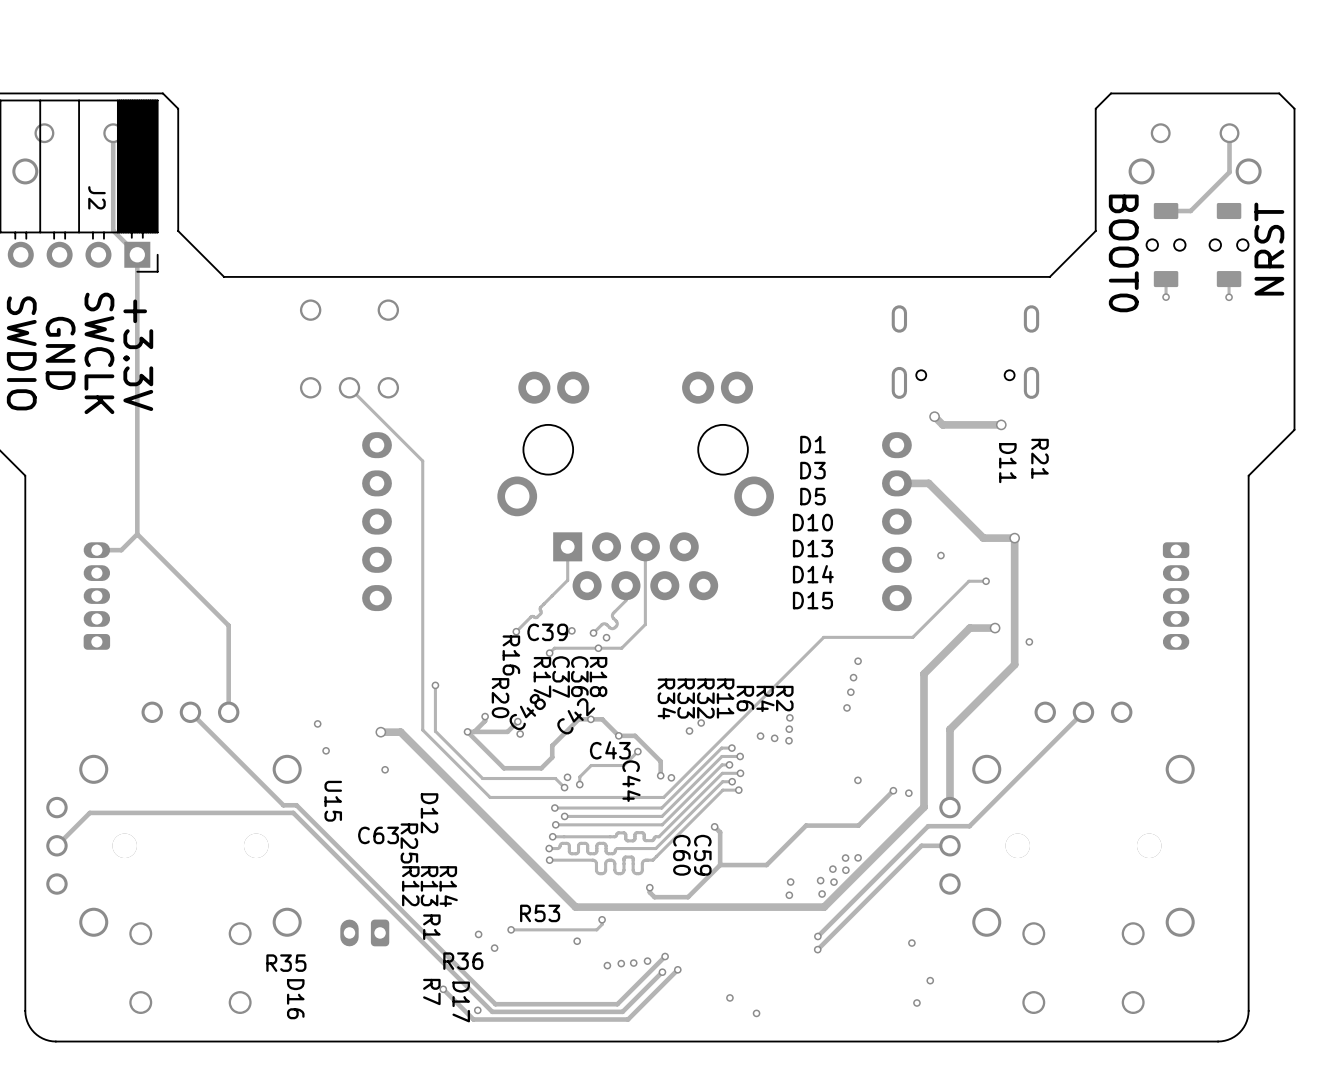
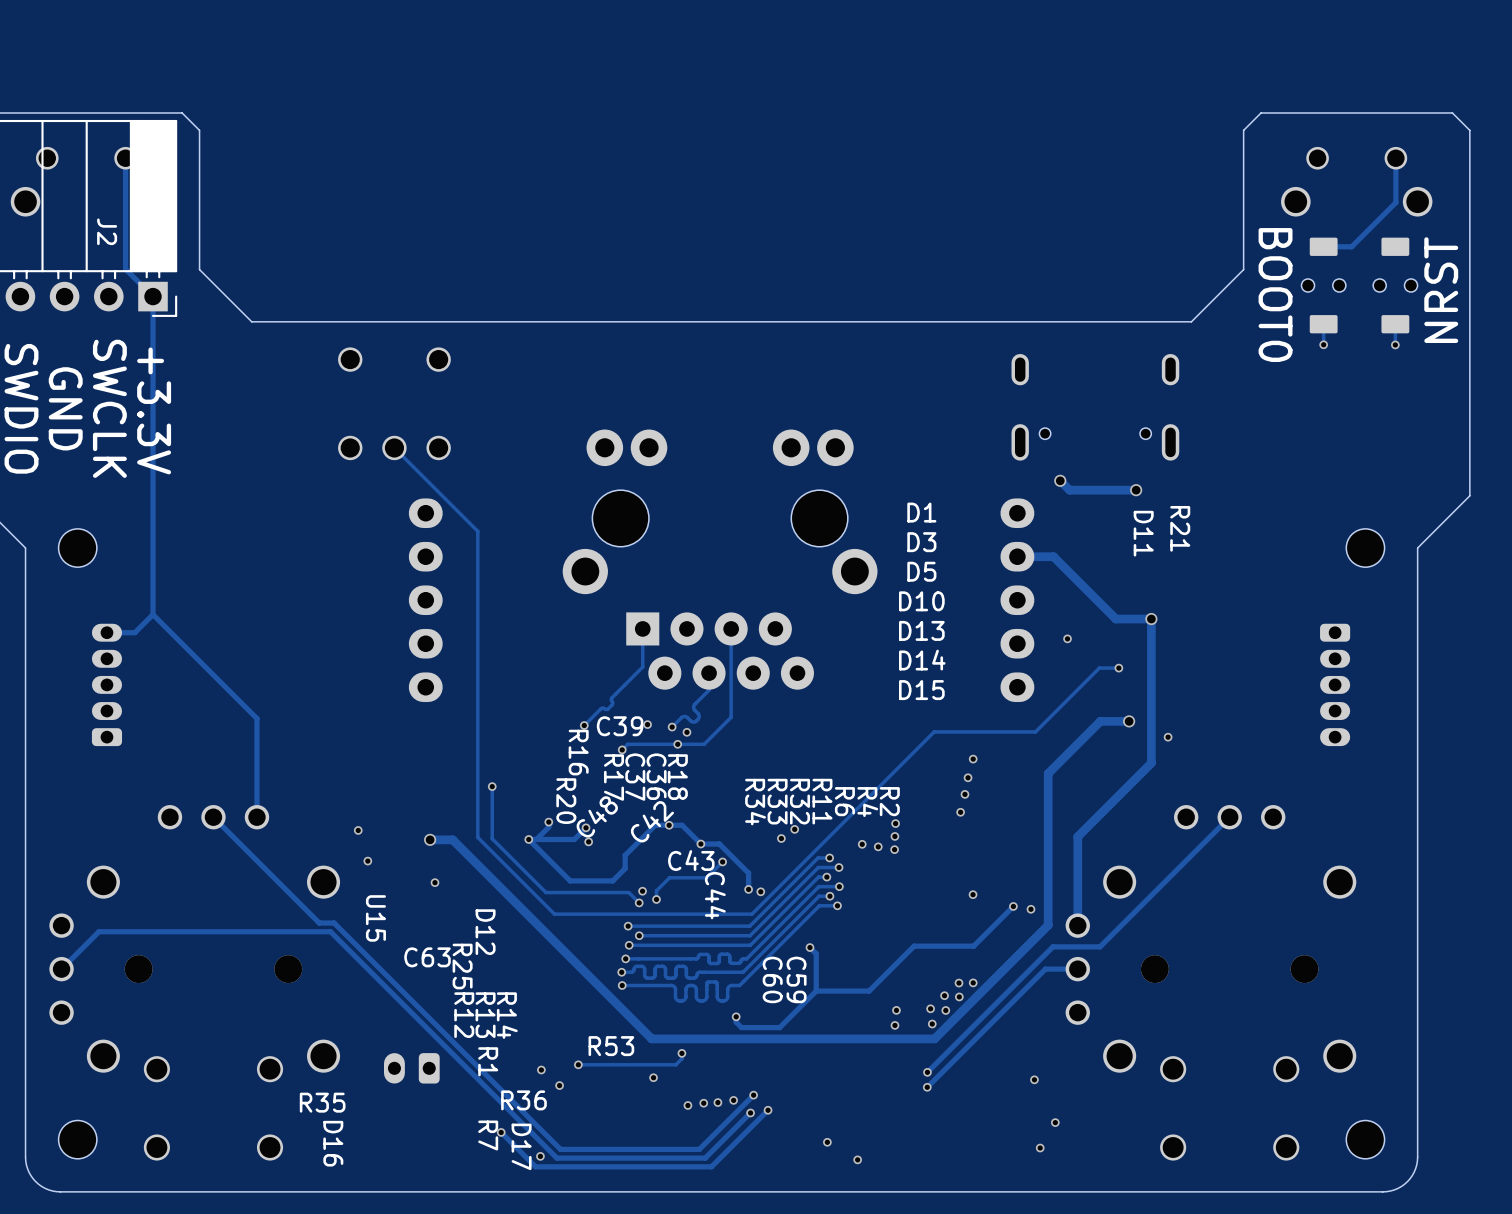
part: none -> (77, 548)
part: none -> (1365, 548)
part: none -> (77, 1139)
part: none -> (1365, 1139)

